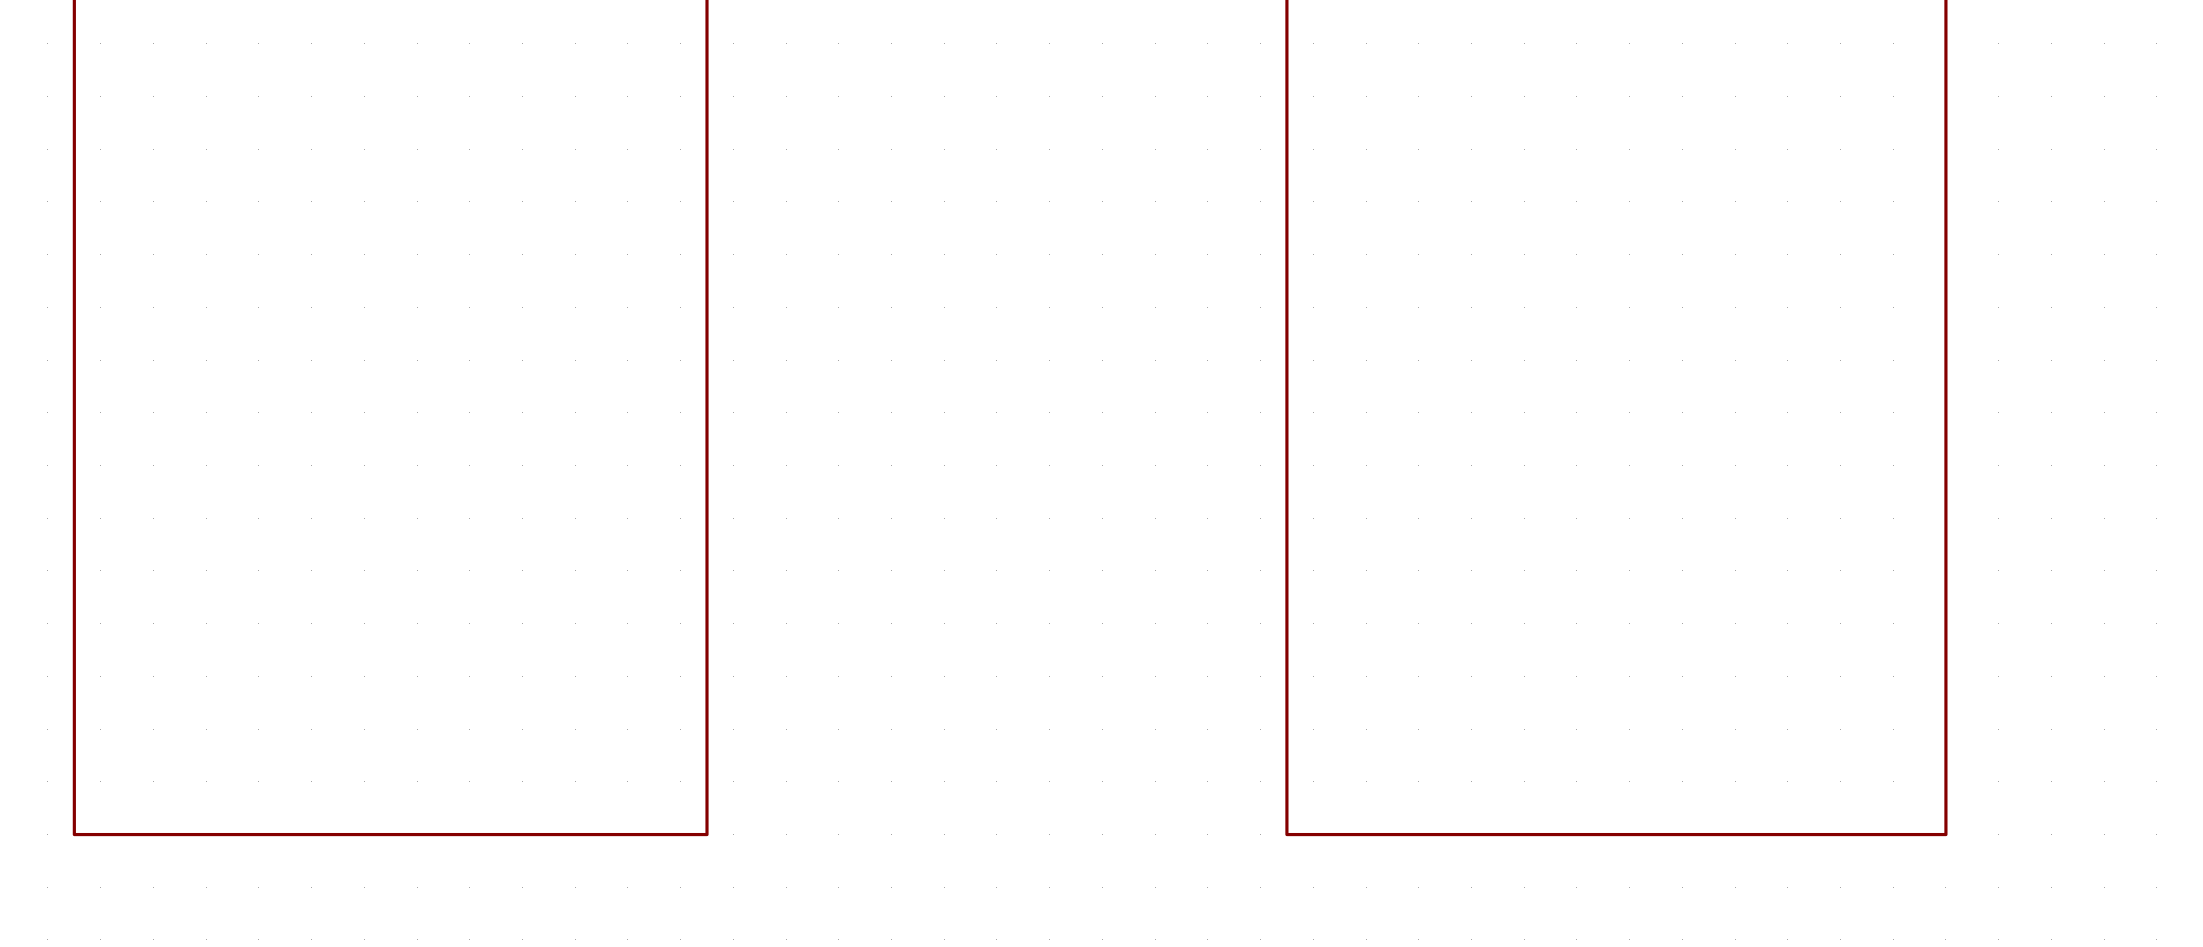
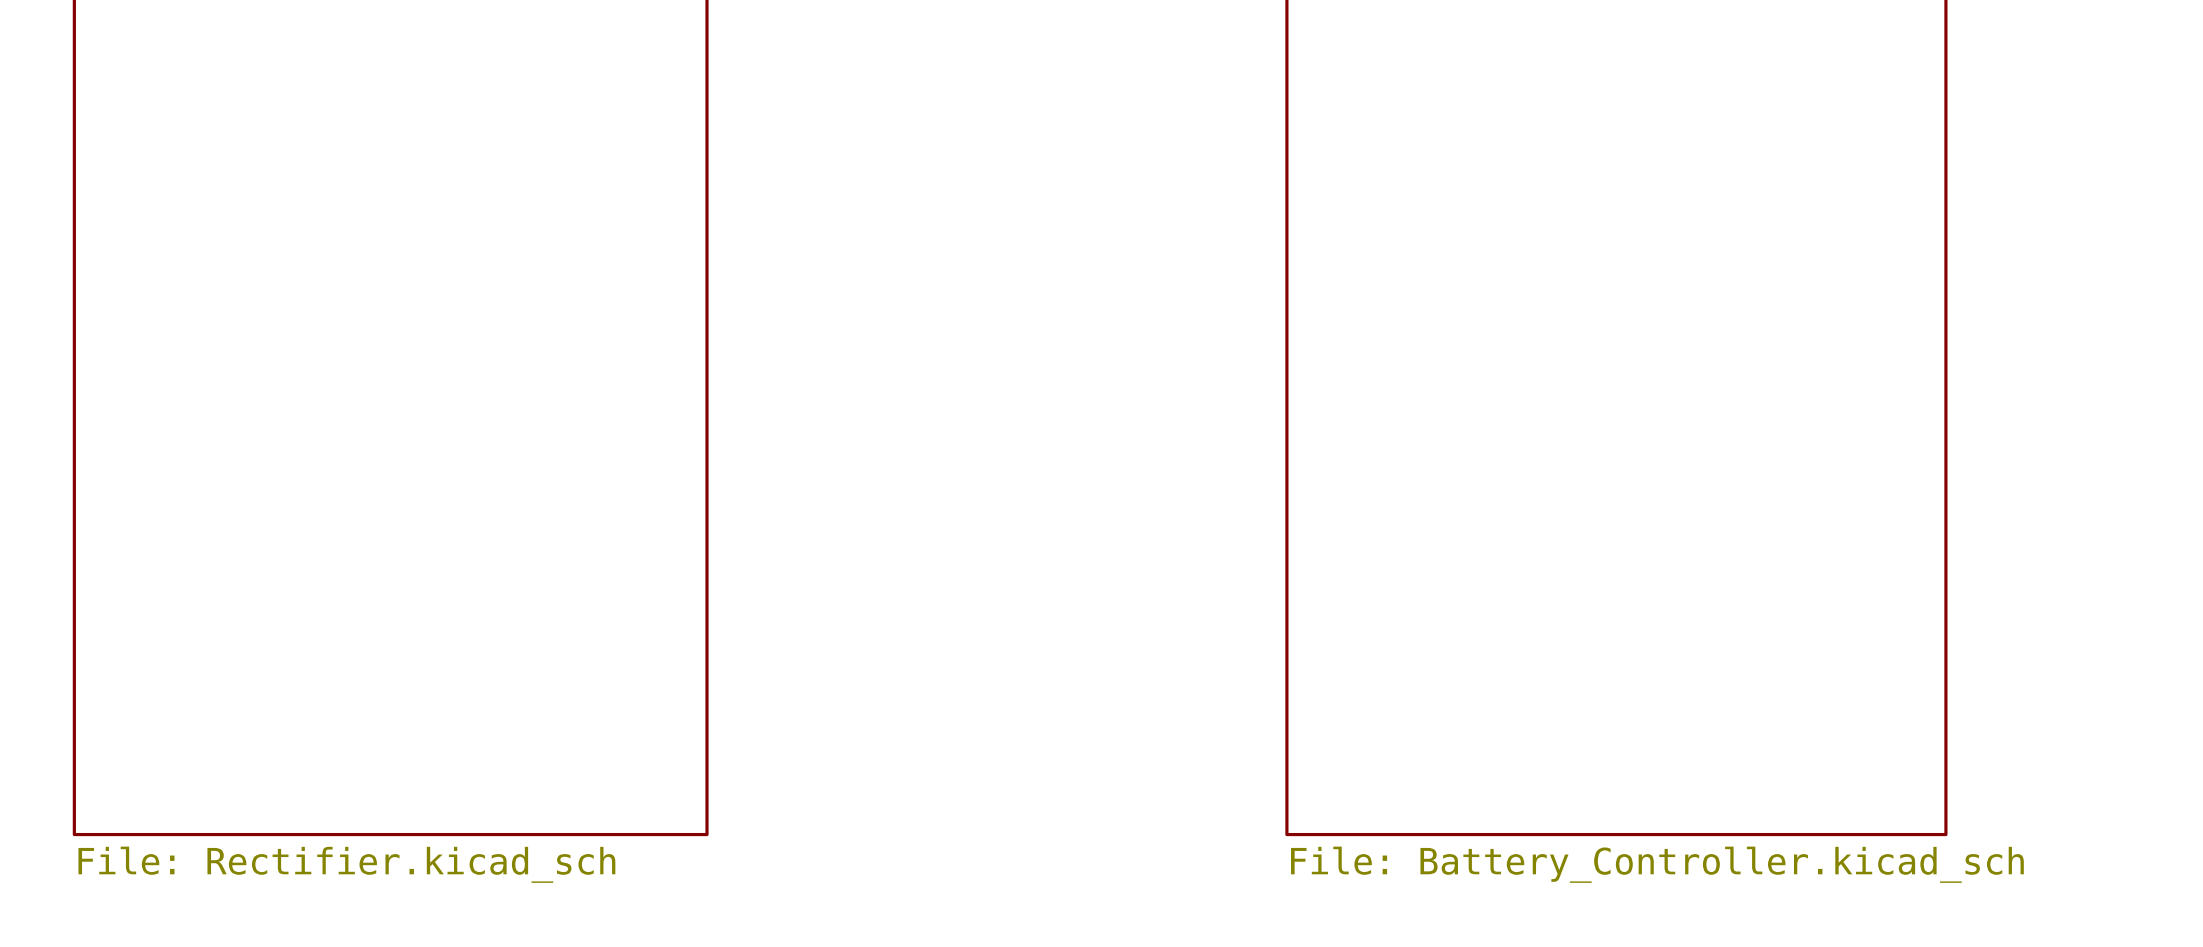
sheet value: none -> File: Rectifier.kicad_sch (346, 864)
sheet value: none -> File: Battery_Controller.kicad_sch (1657, 864)

